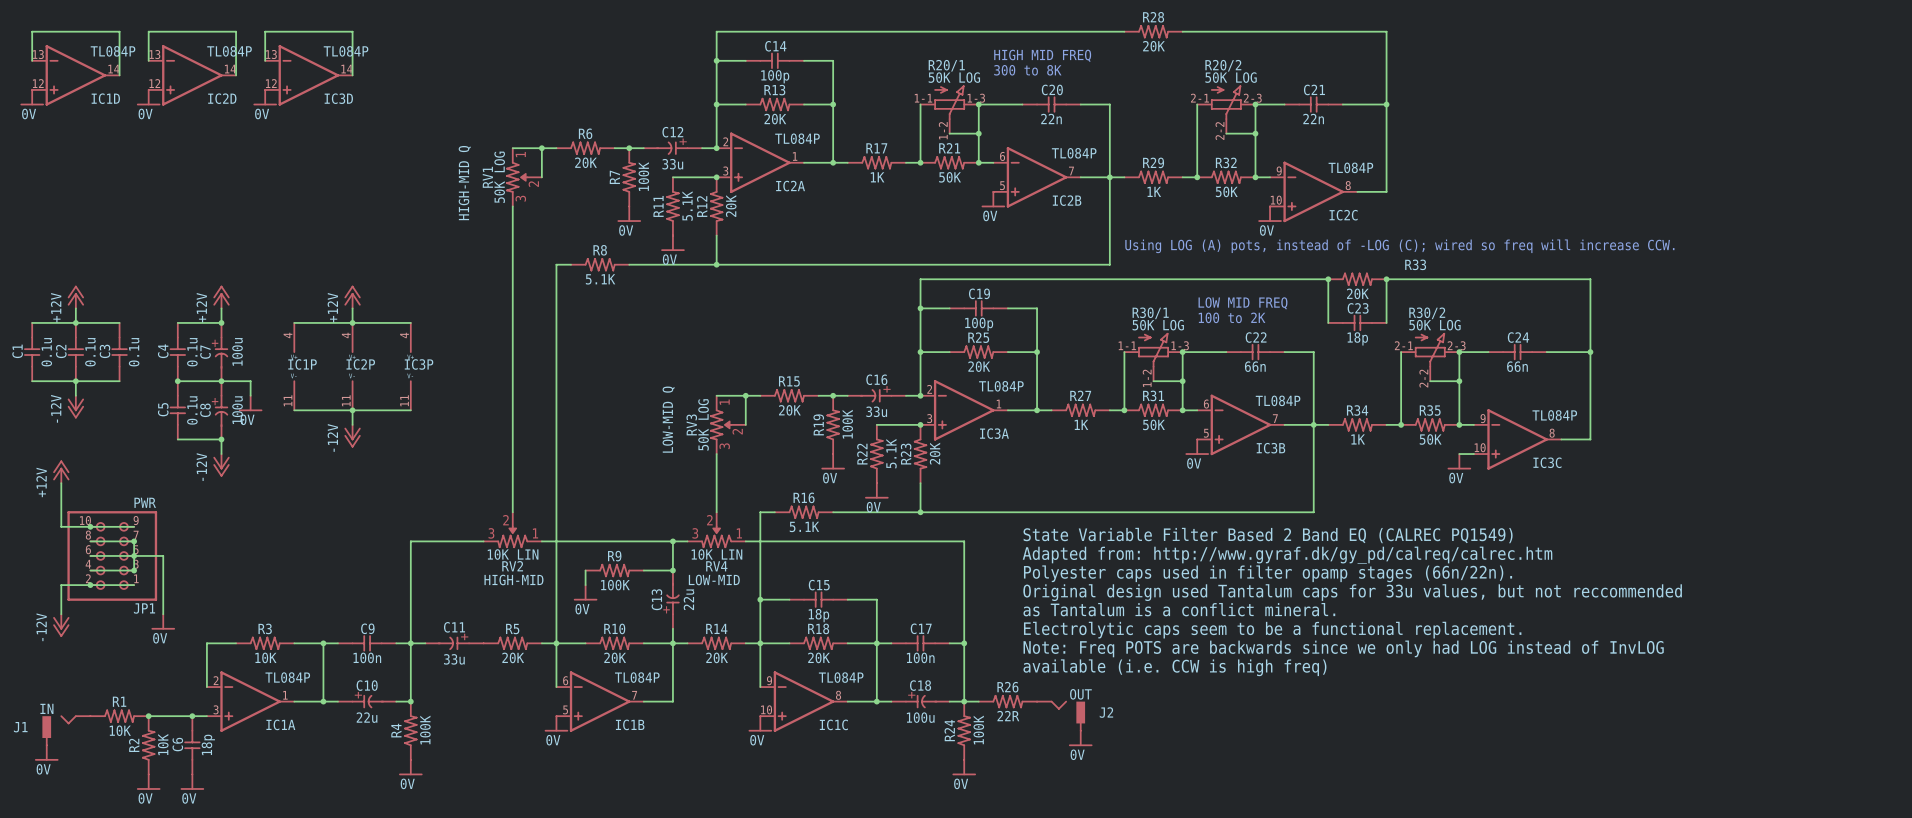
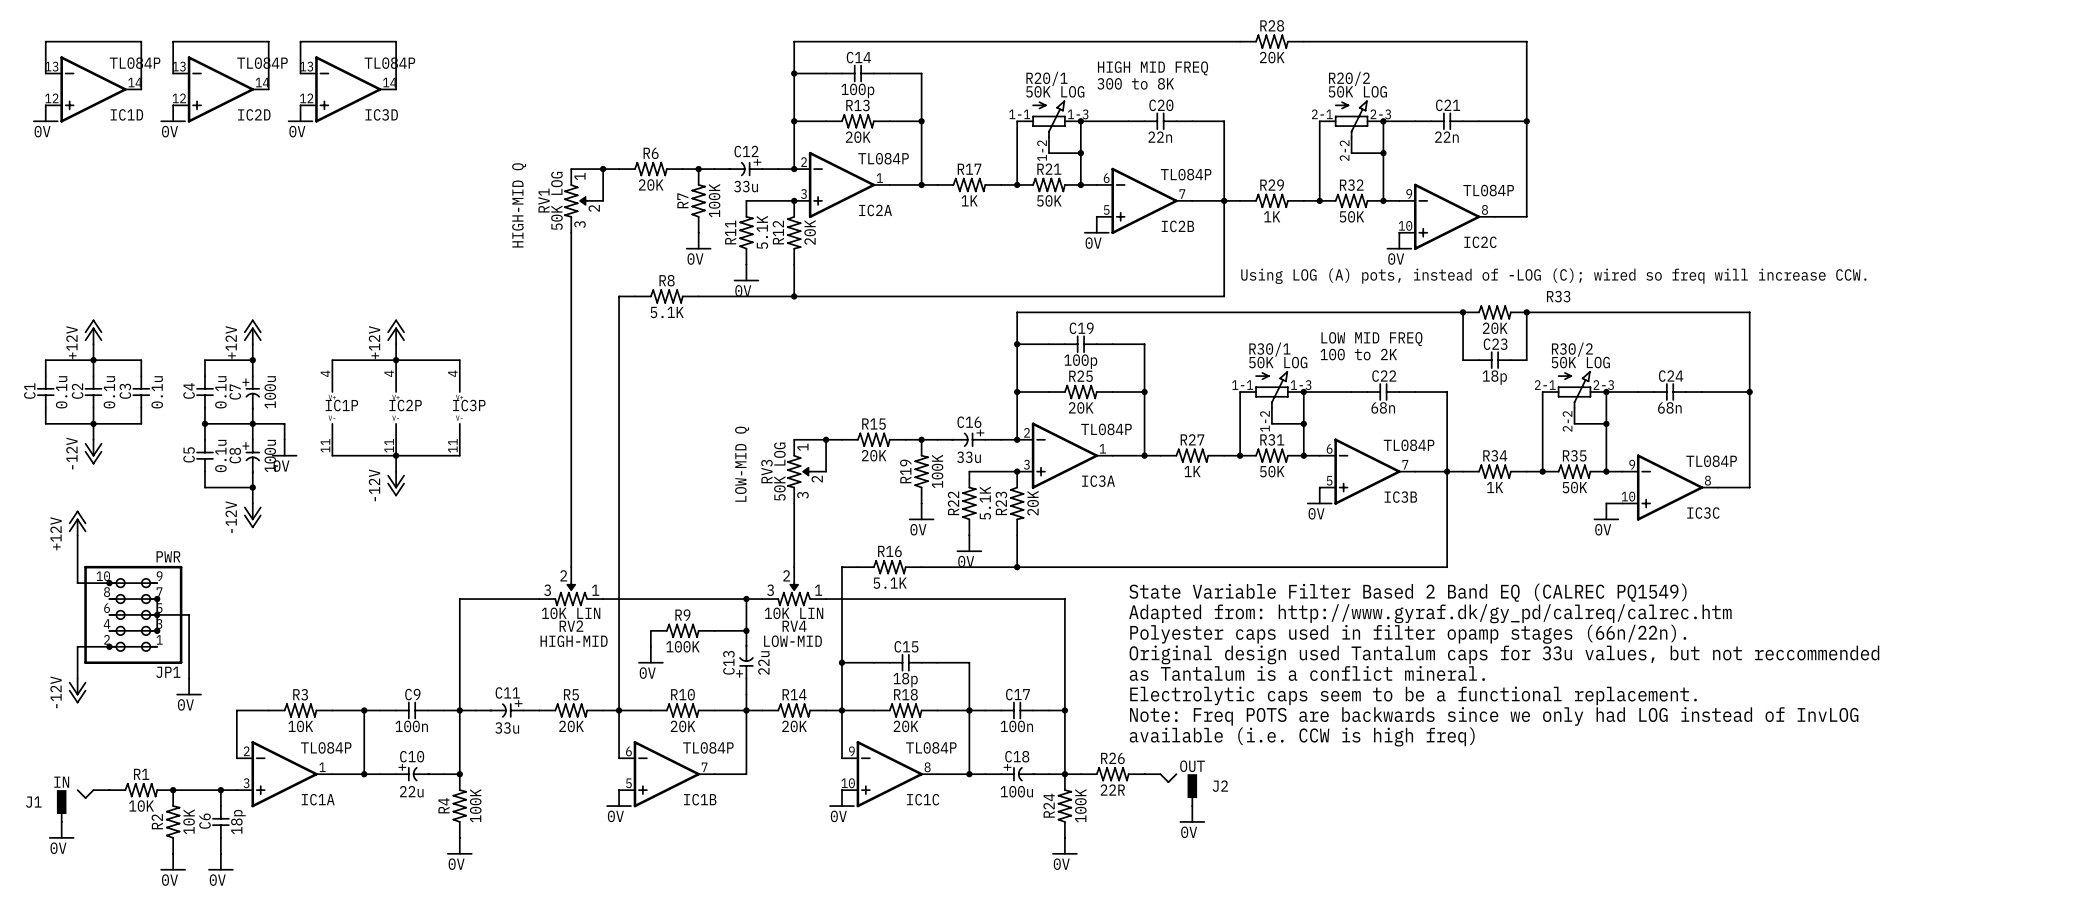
C22 value: 66n (1255, 366) -> 68n (1383, 407)
C24 value: 66n (1517, 366) -> 68n (1669, 407)

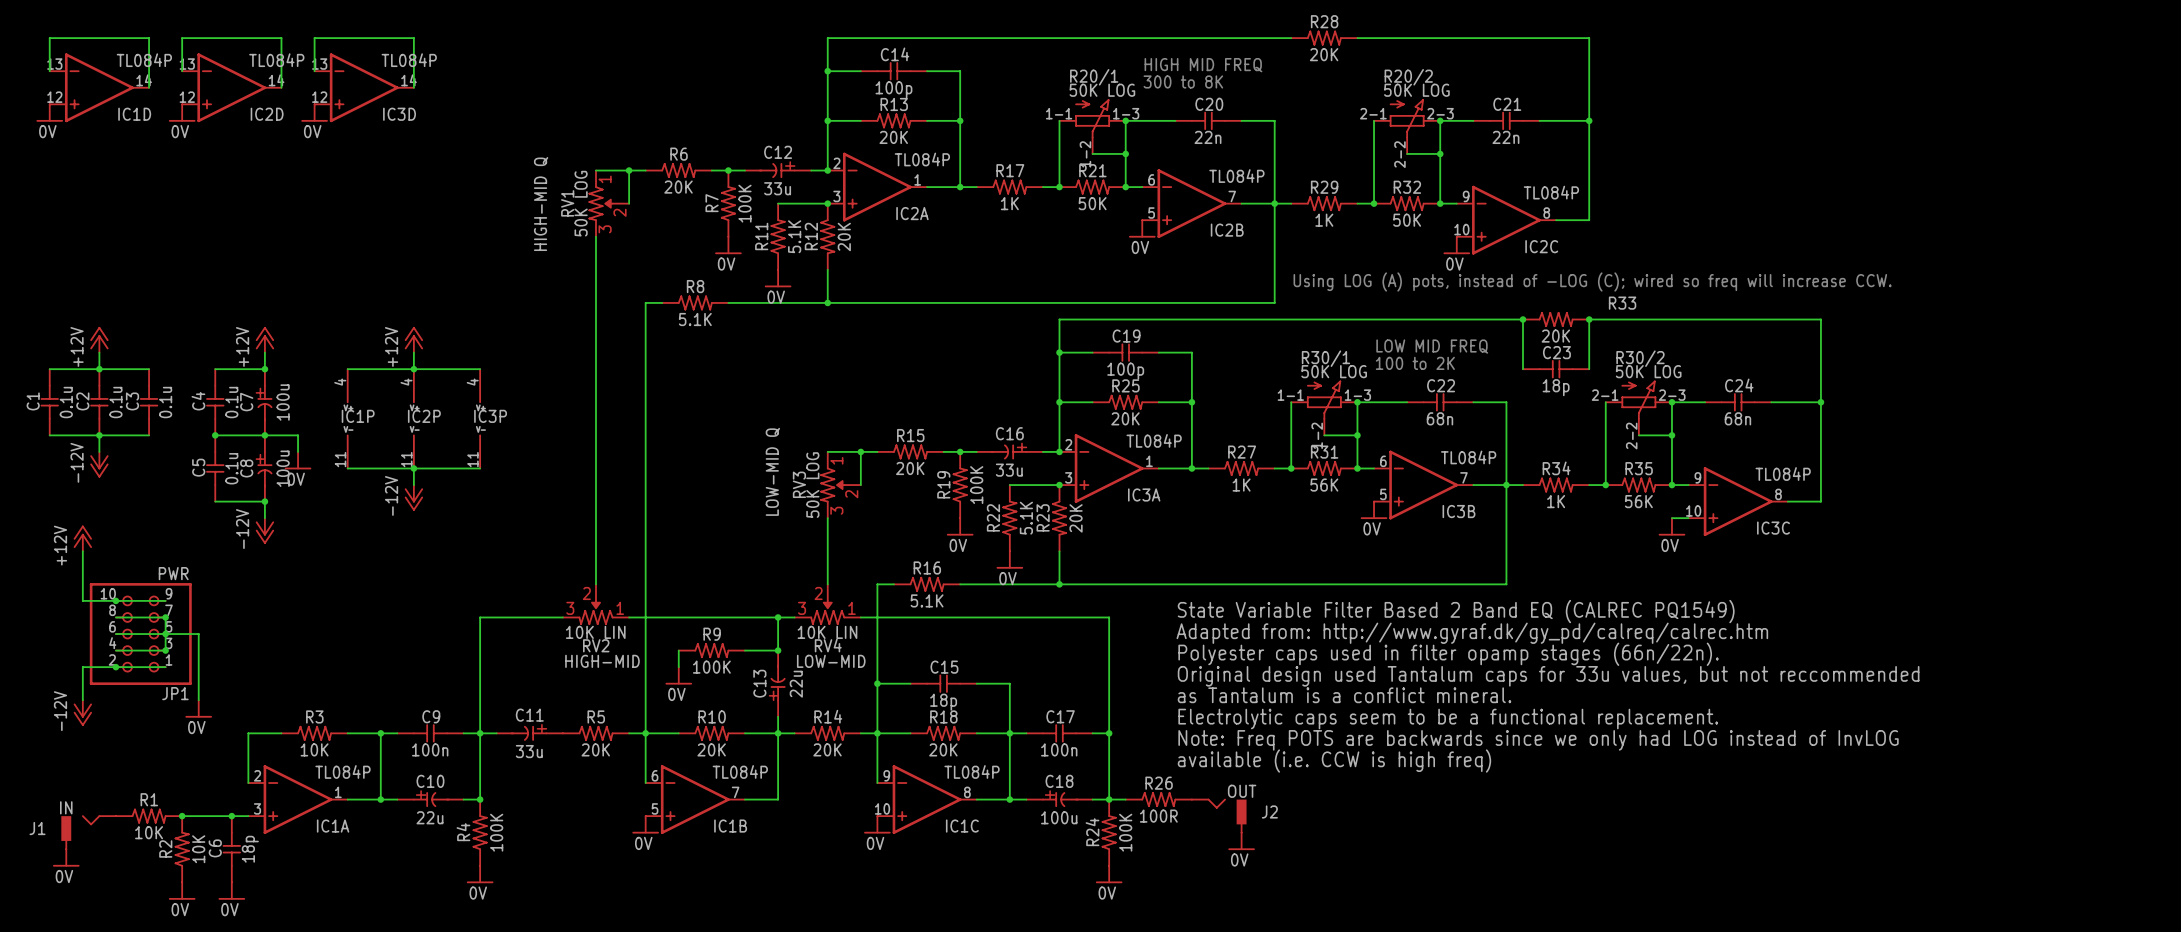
R31 value: 50K (1272, 471) -> 56K (1324, 485)
R35 value: 50K (1574, 487) -> 56K (1638, 501)
R26 value: 22R (1112, 790) -> 100R (1158, 816)

